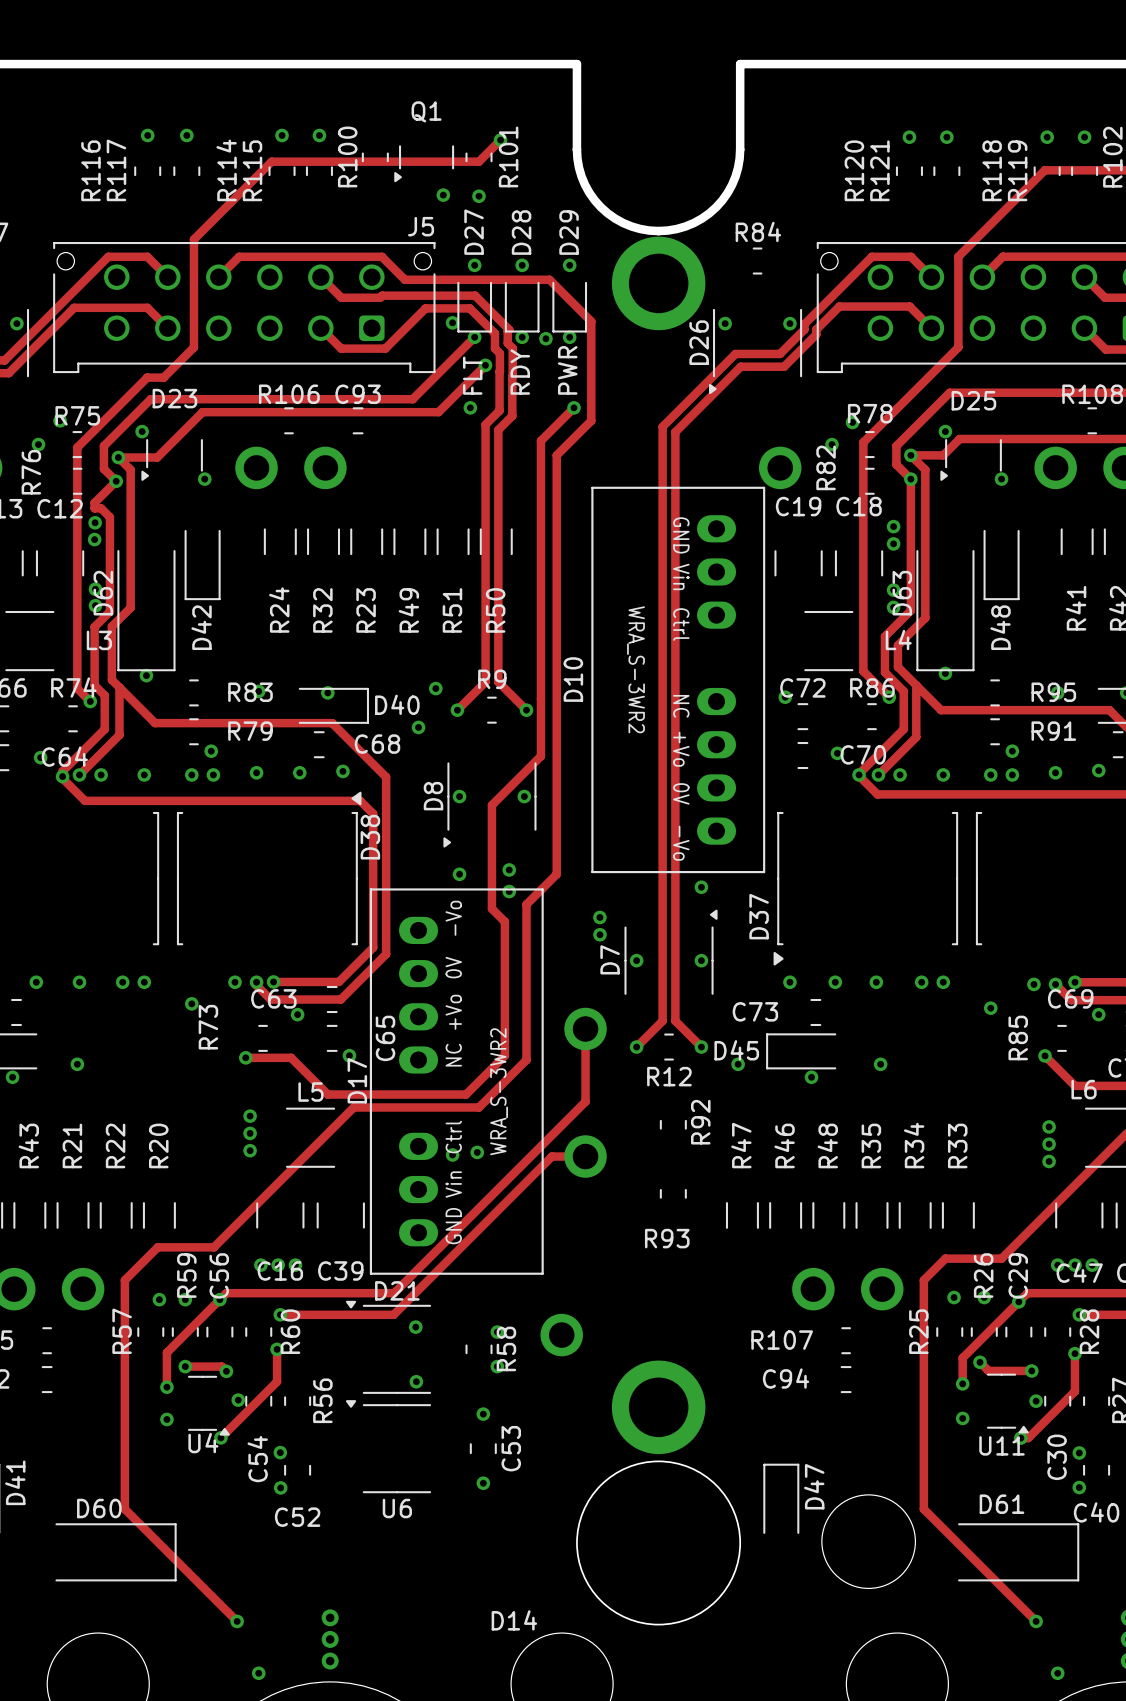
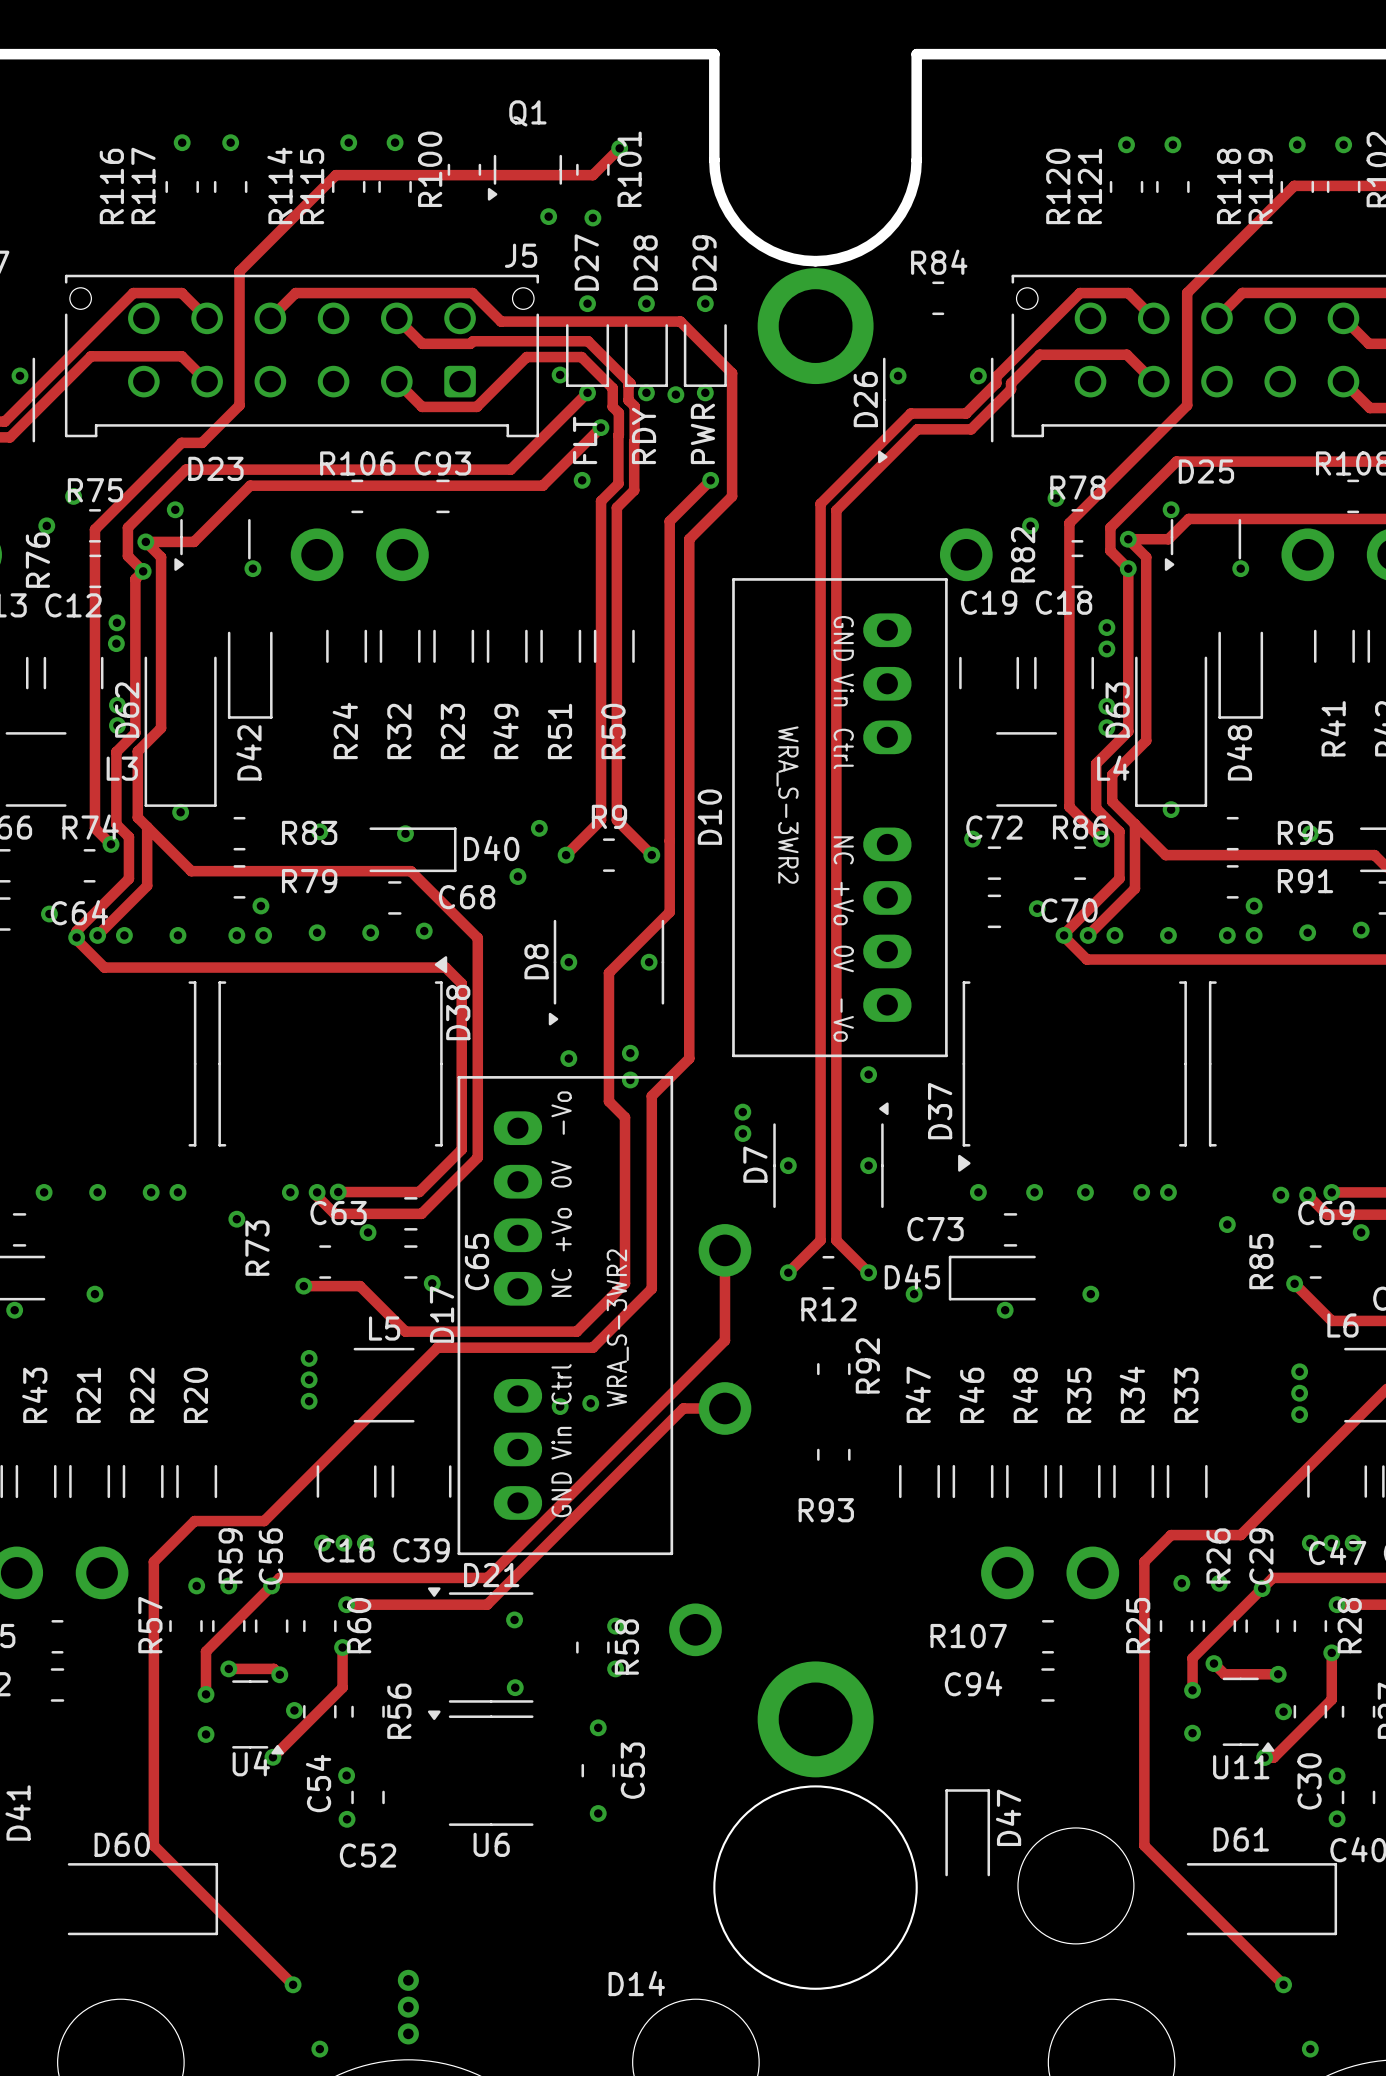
track: (109, 487) (94, 502) (94, 508) (101, 508) (109, 517) -> (135, 579) (135, 615)

